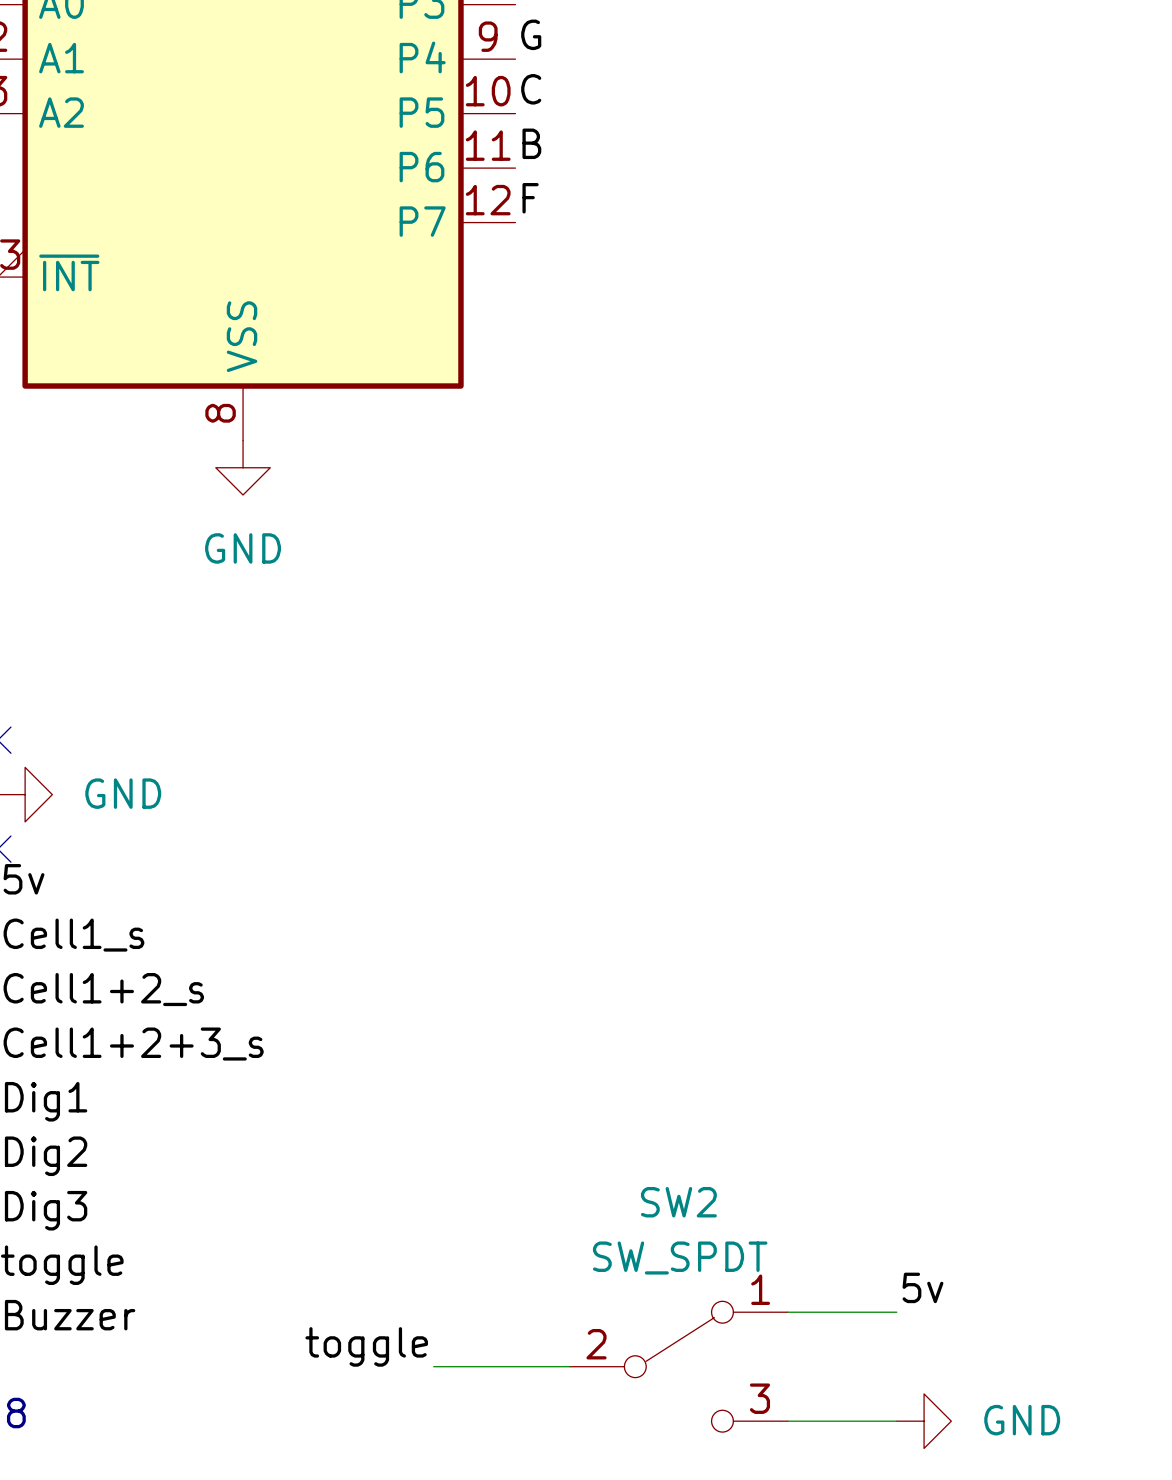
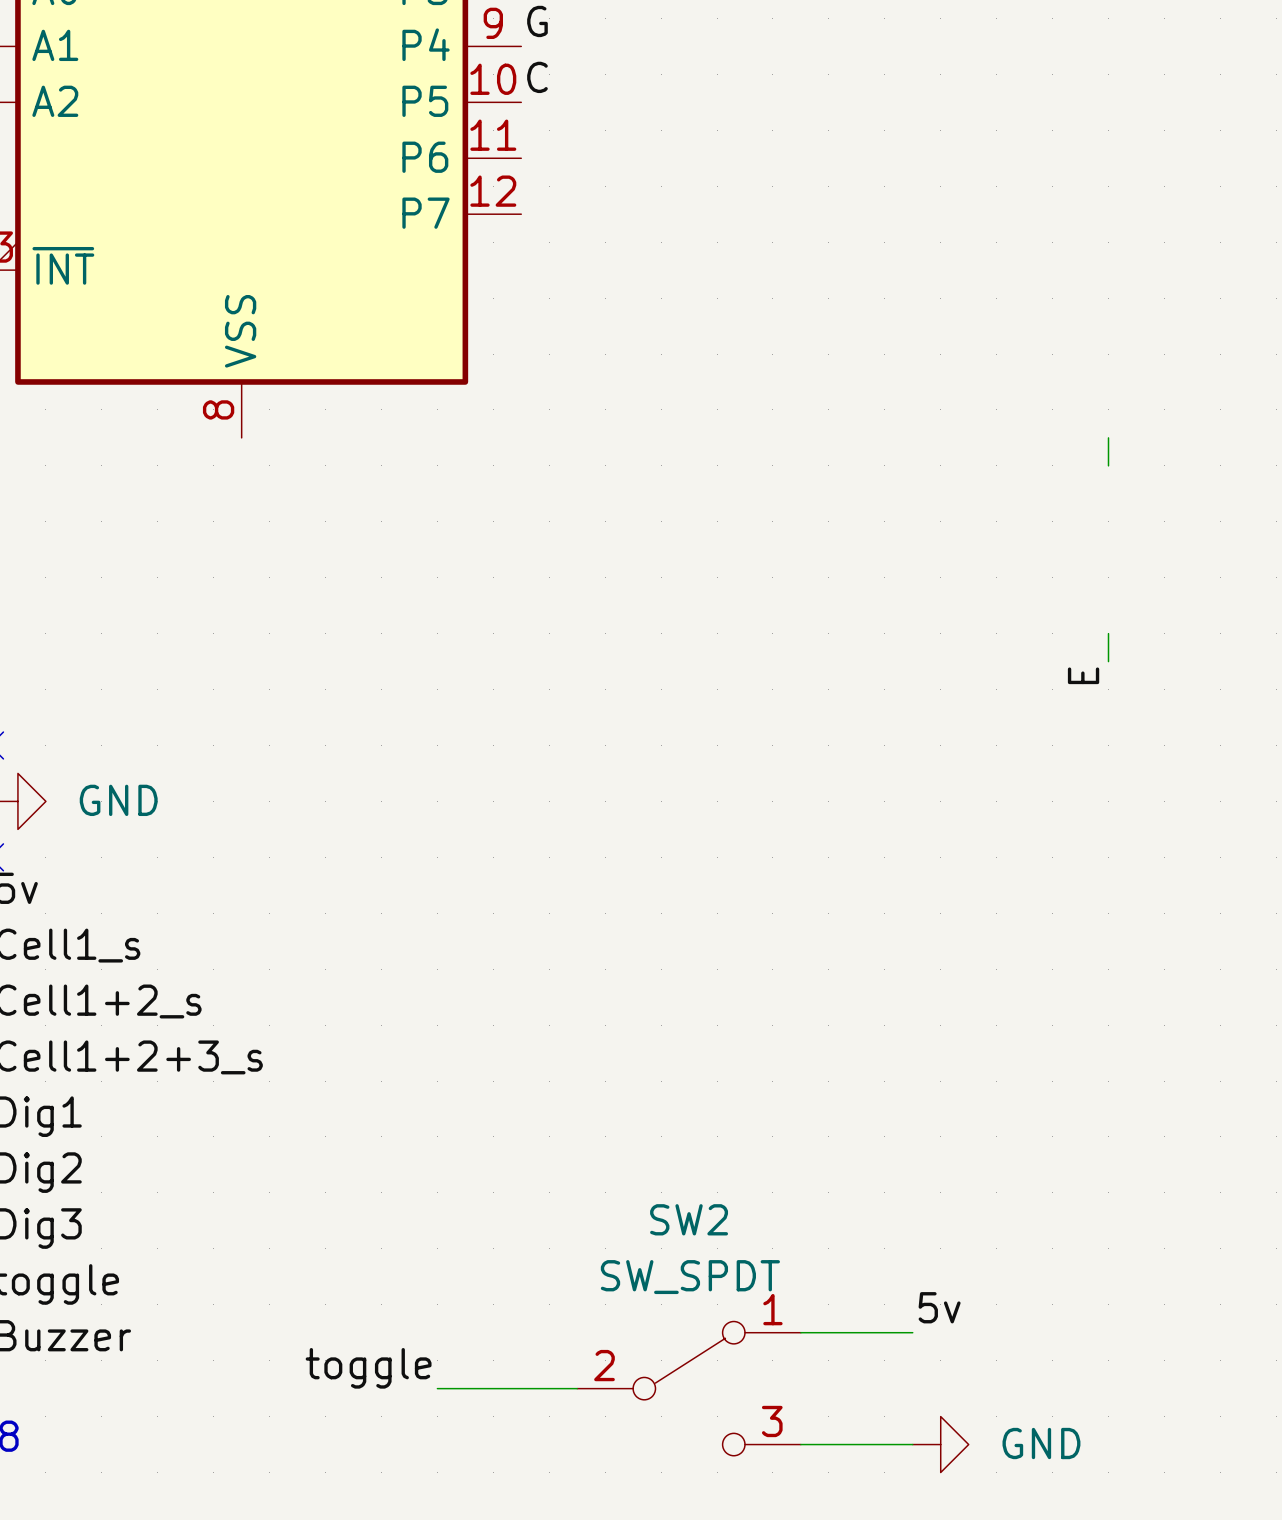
label: B (531, 143) -> none
label: F (530, 198) -> none
wire: none -> (1108, 437) (1108, 465)
power symbol: GND (243, 467) -> none
wire: none -> (1108, 633) (1108, 661)
label: none -> E (1083, 675)

